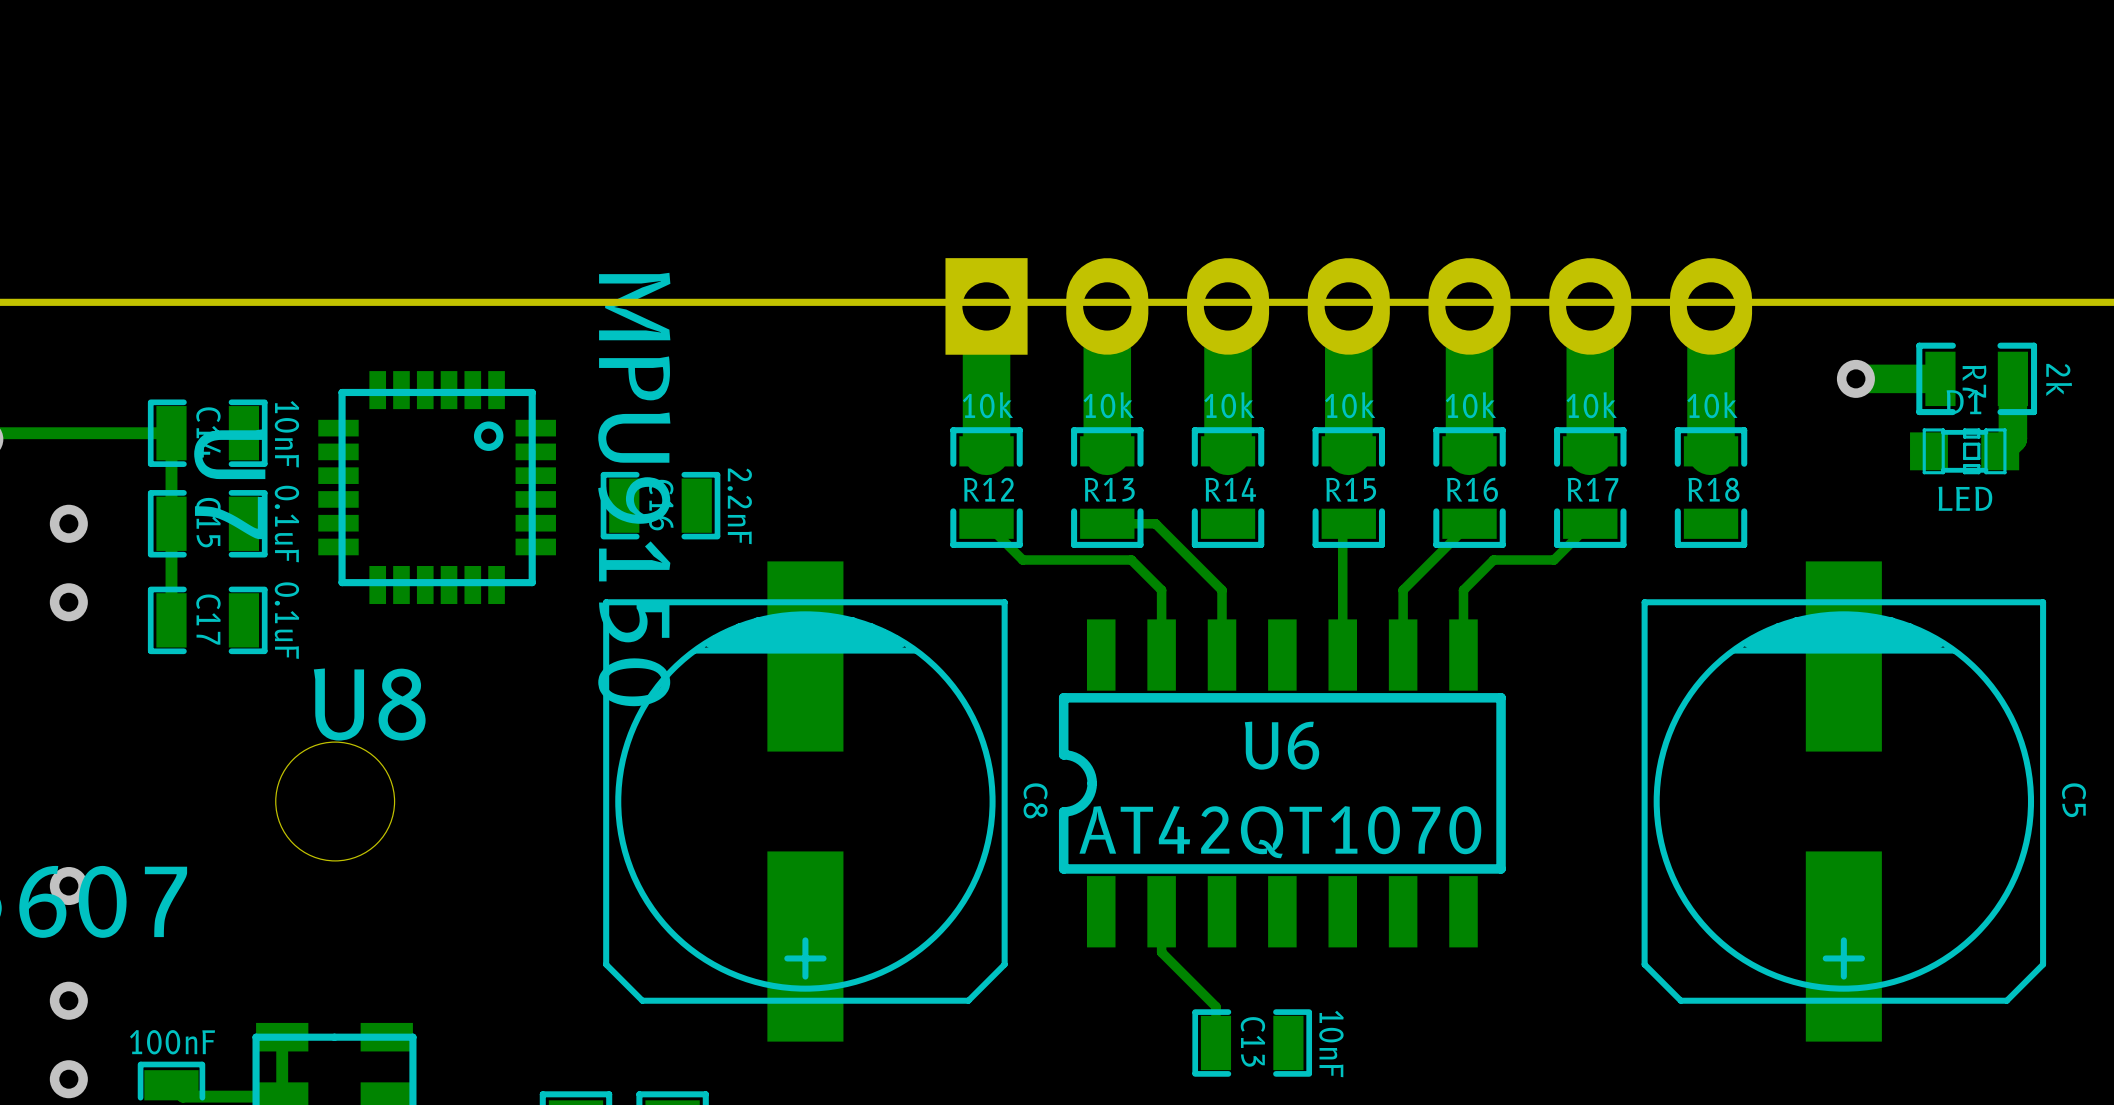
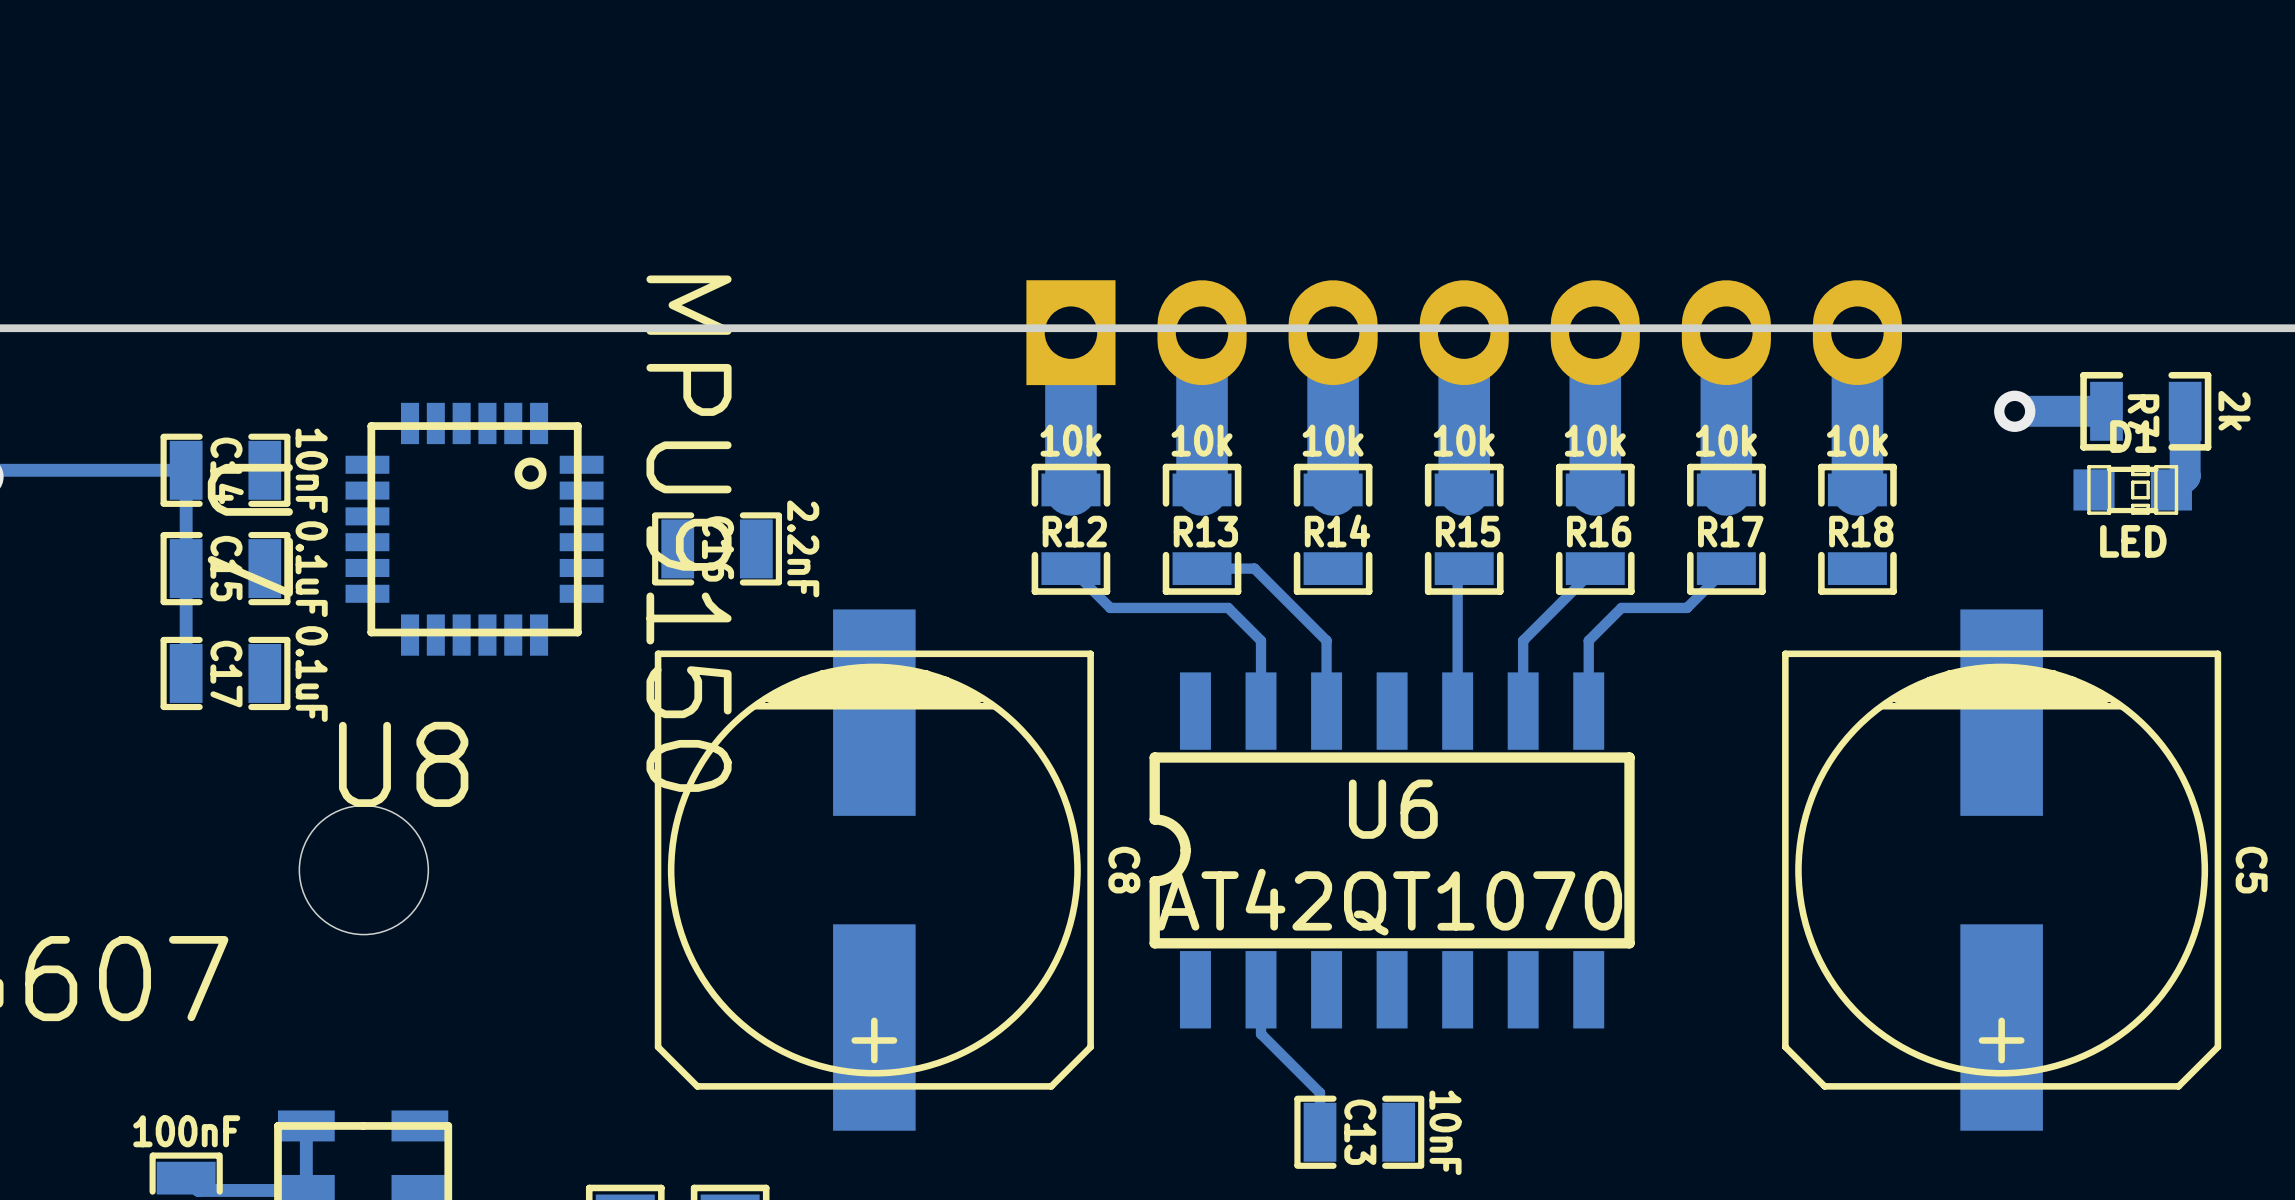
via: (68, 523) -> none
via: (68, 602) -> none
via: (68, 886) -> none
via: (68, 1000) -> none
via: (68, 1079) -> none

